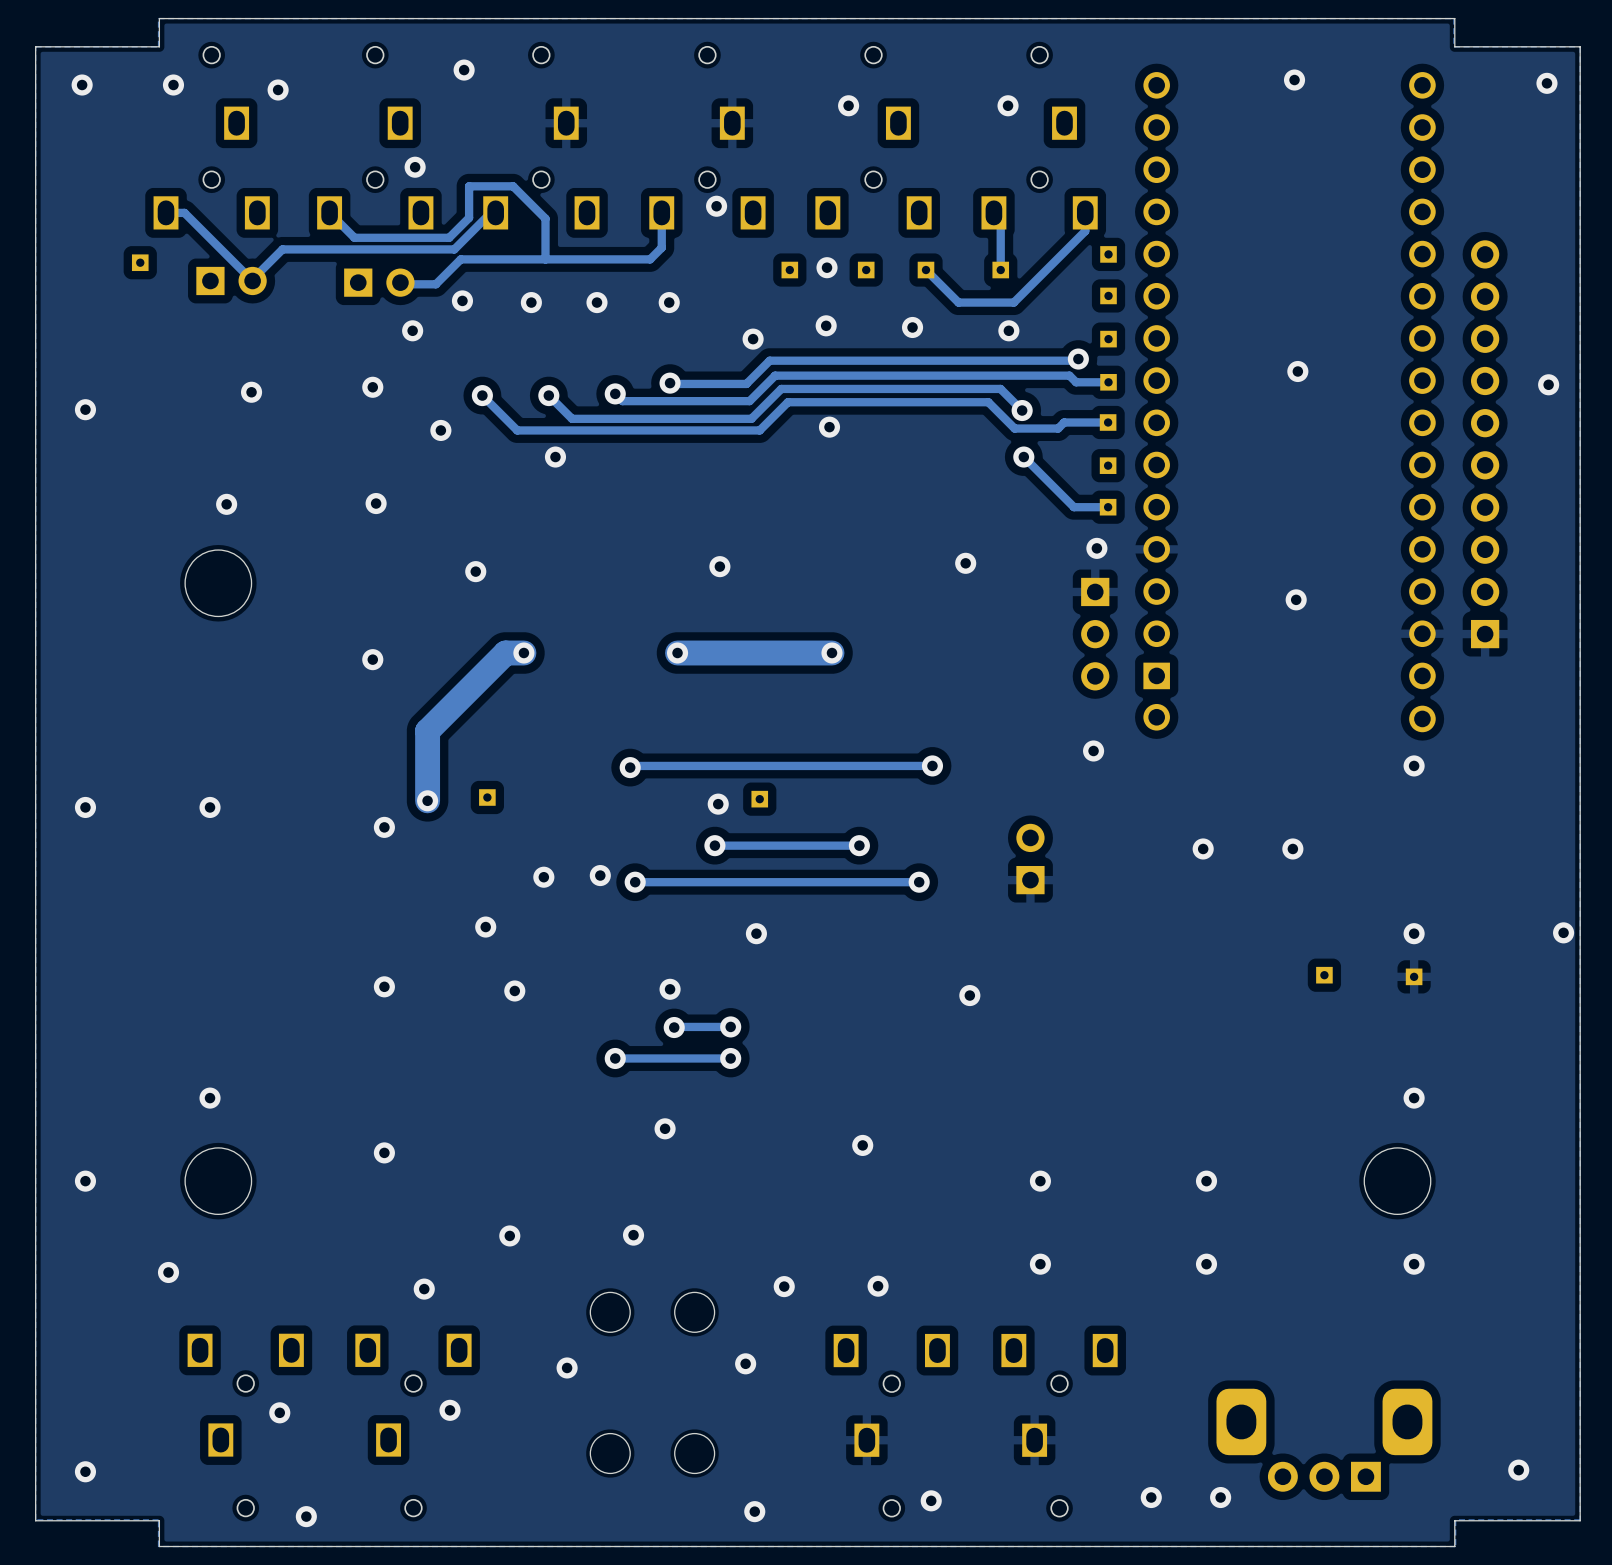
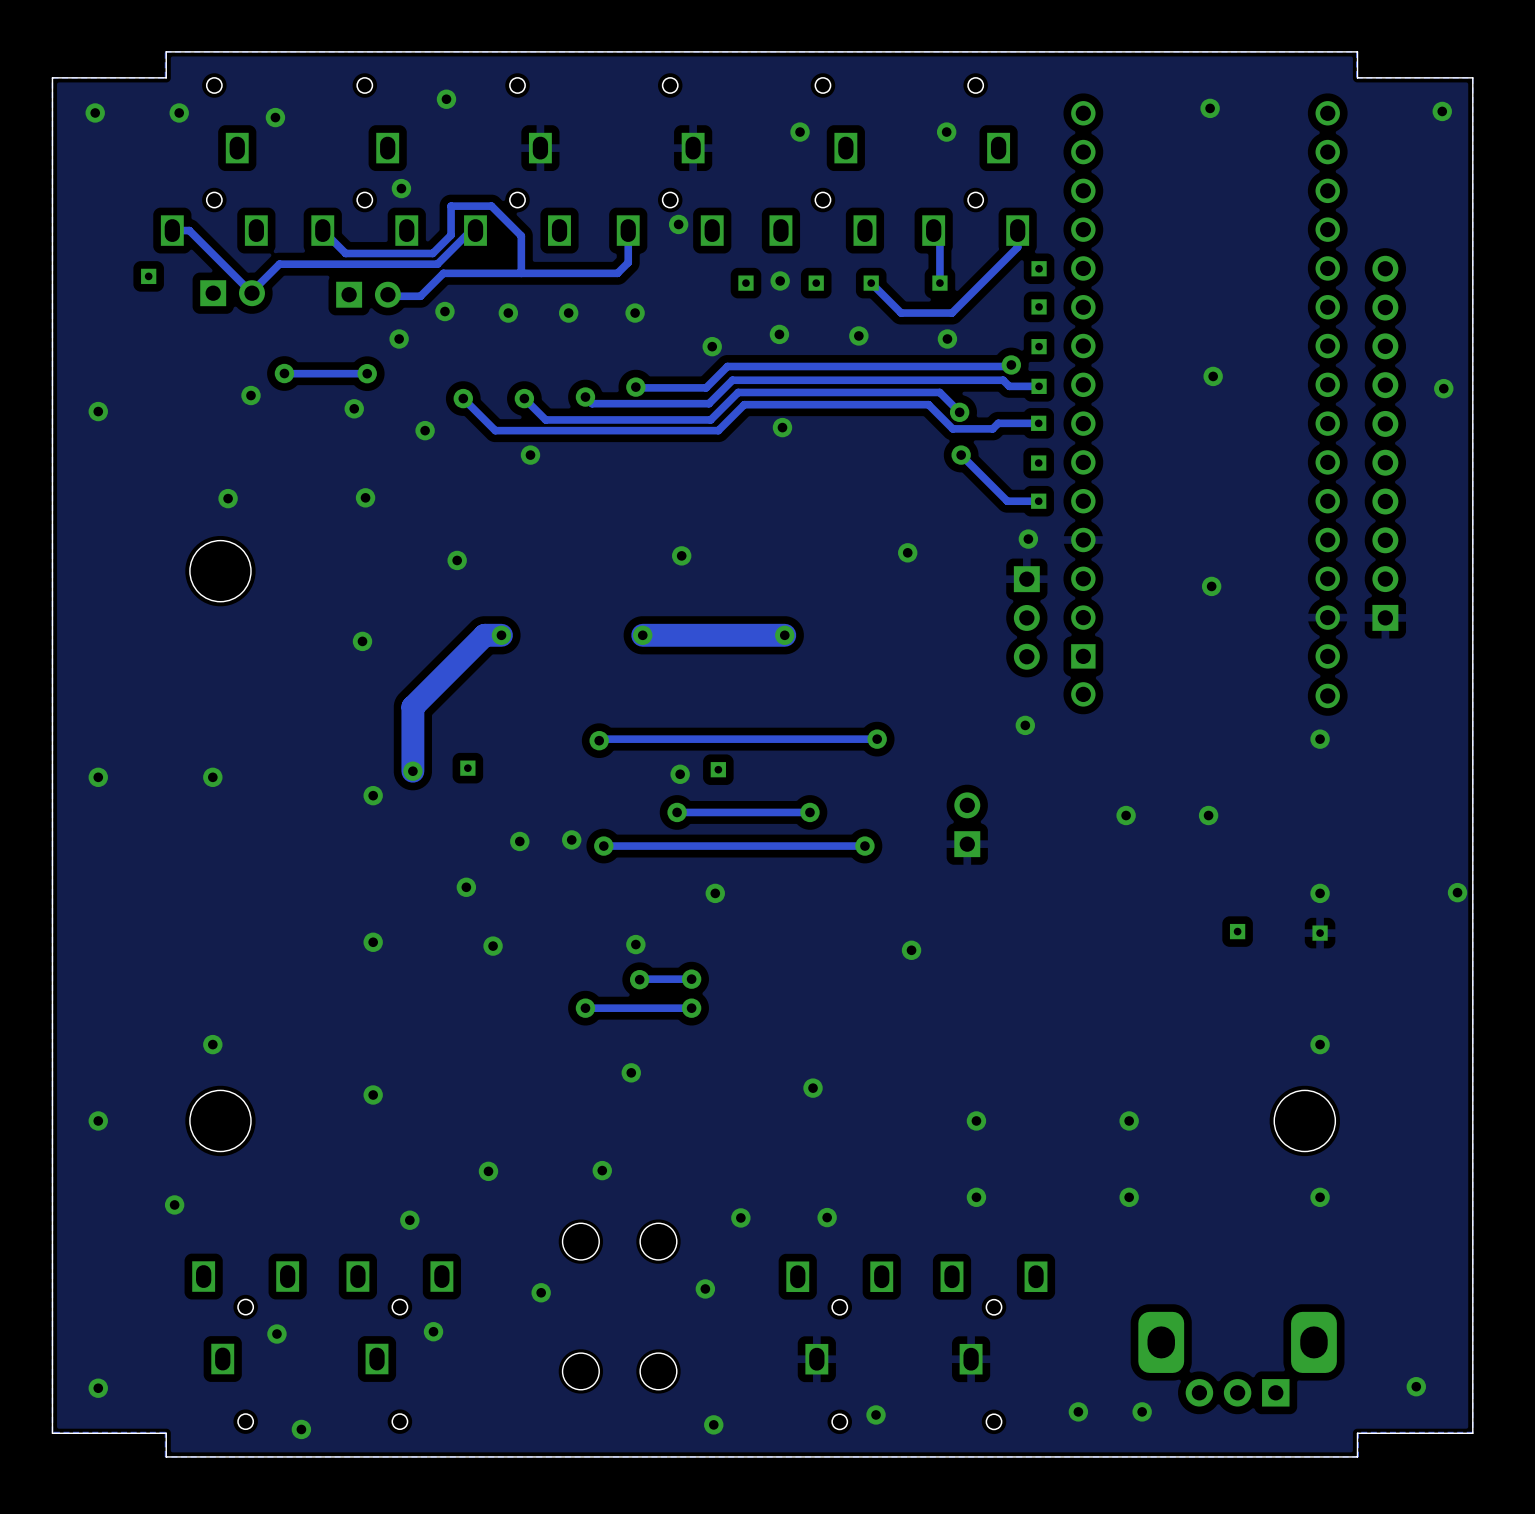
via: none -> (284, 373)
track: none -> (367, 373) (284, 373)
via: none -> (367, 373)
via: (372, 387) -> none
via: none -> (354, 408)

